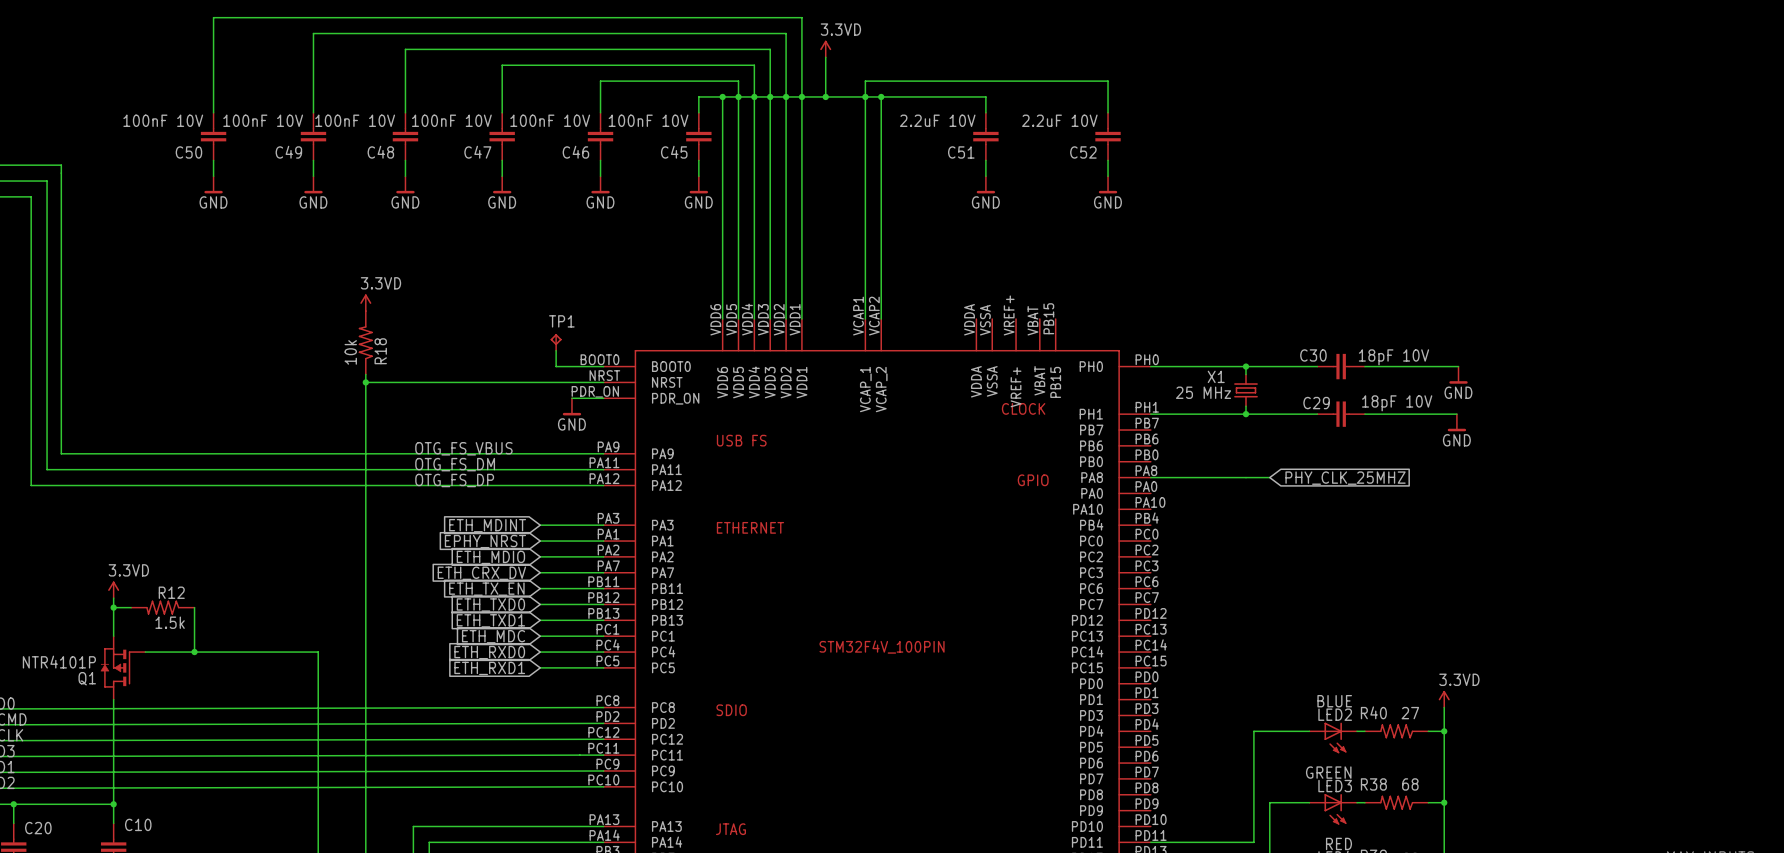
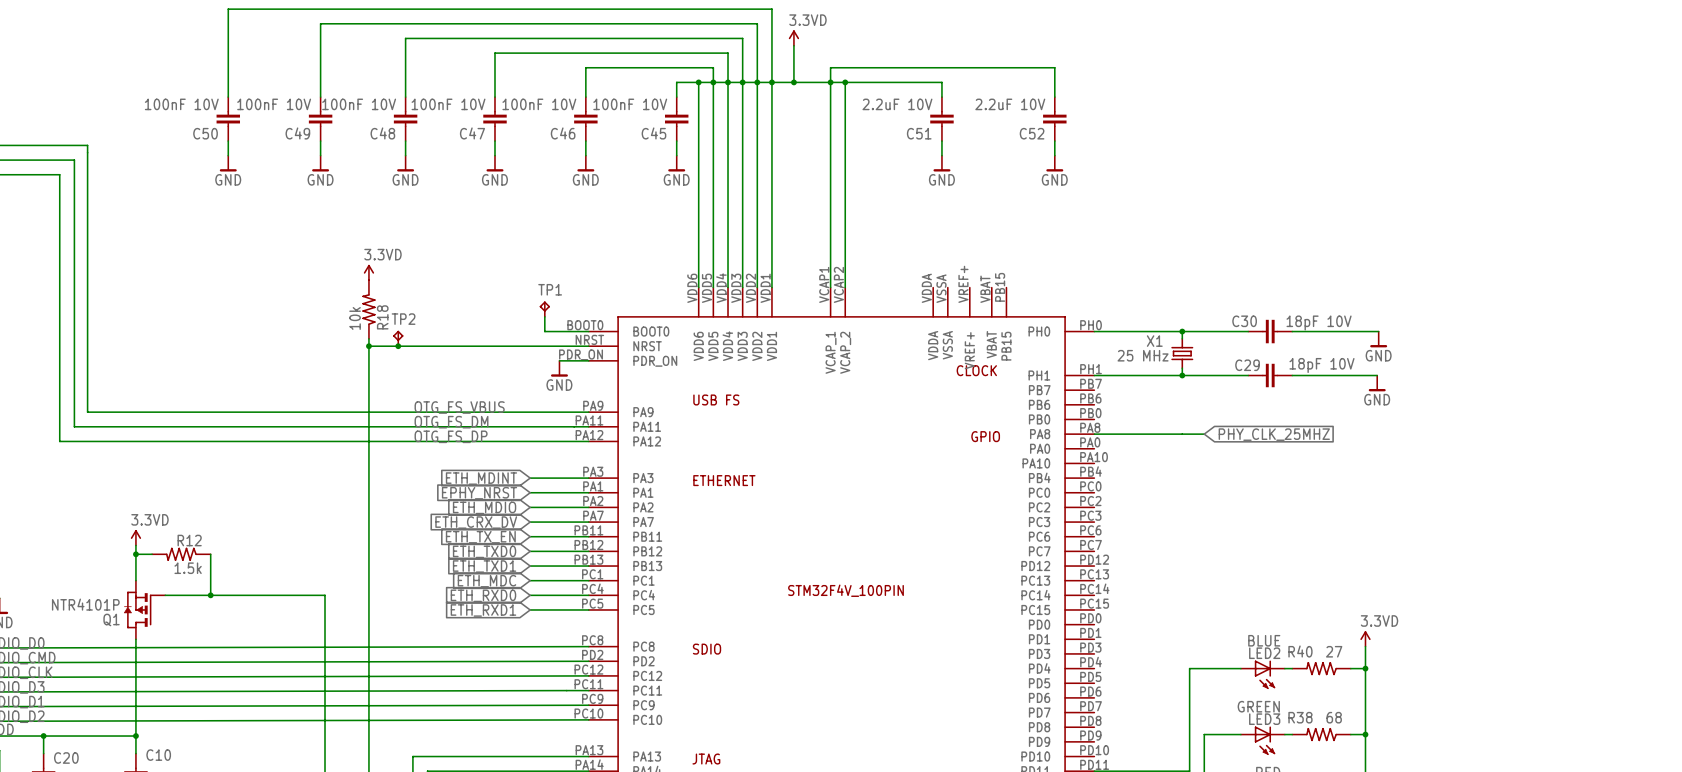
TP2: none -> (398, 338)
junction: none -> (398, 346)

